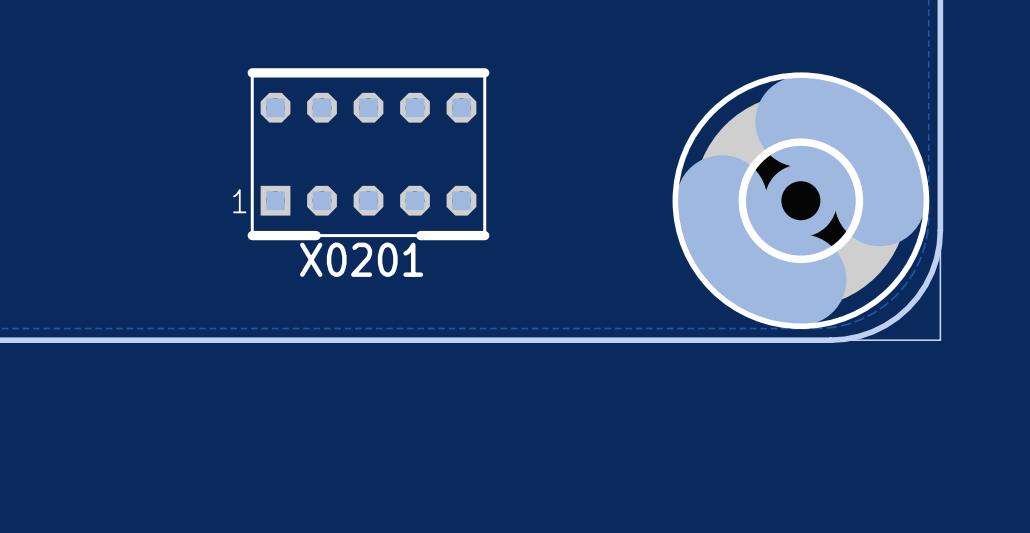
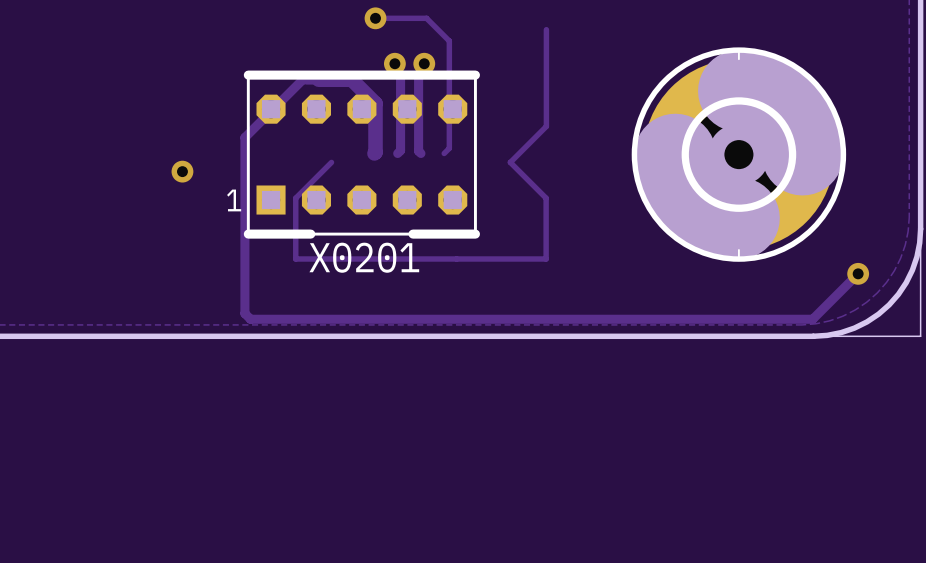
track: none -> (375, 18) (426, 18) (449, 41) (449, 148) (444, 153)
via: none -> (375, 18)
track: none -> (546, 29) (546, 126) (510, 162) (546, 198) (546, 258) (295, 258) (295, 198) (331, 162)
track: none -> (394, 63) (400, 75) (400, 150) (397, 153)
via: none -> (394, 63)
track: none -> (424, 63) (418, 75) (418, 151) (420, 153)
via: none -> (424, 63)
track: none -> (374, 153) (375, 103) (351, 79) (302, 79) (244, 137) (244, 313) (250, 319) (812, 319) (858, 273)
part: none -> (738, 154)
via: none -> (182, 171)
part: (800, 200) -> none
via: none -> (858, 273)

